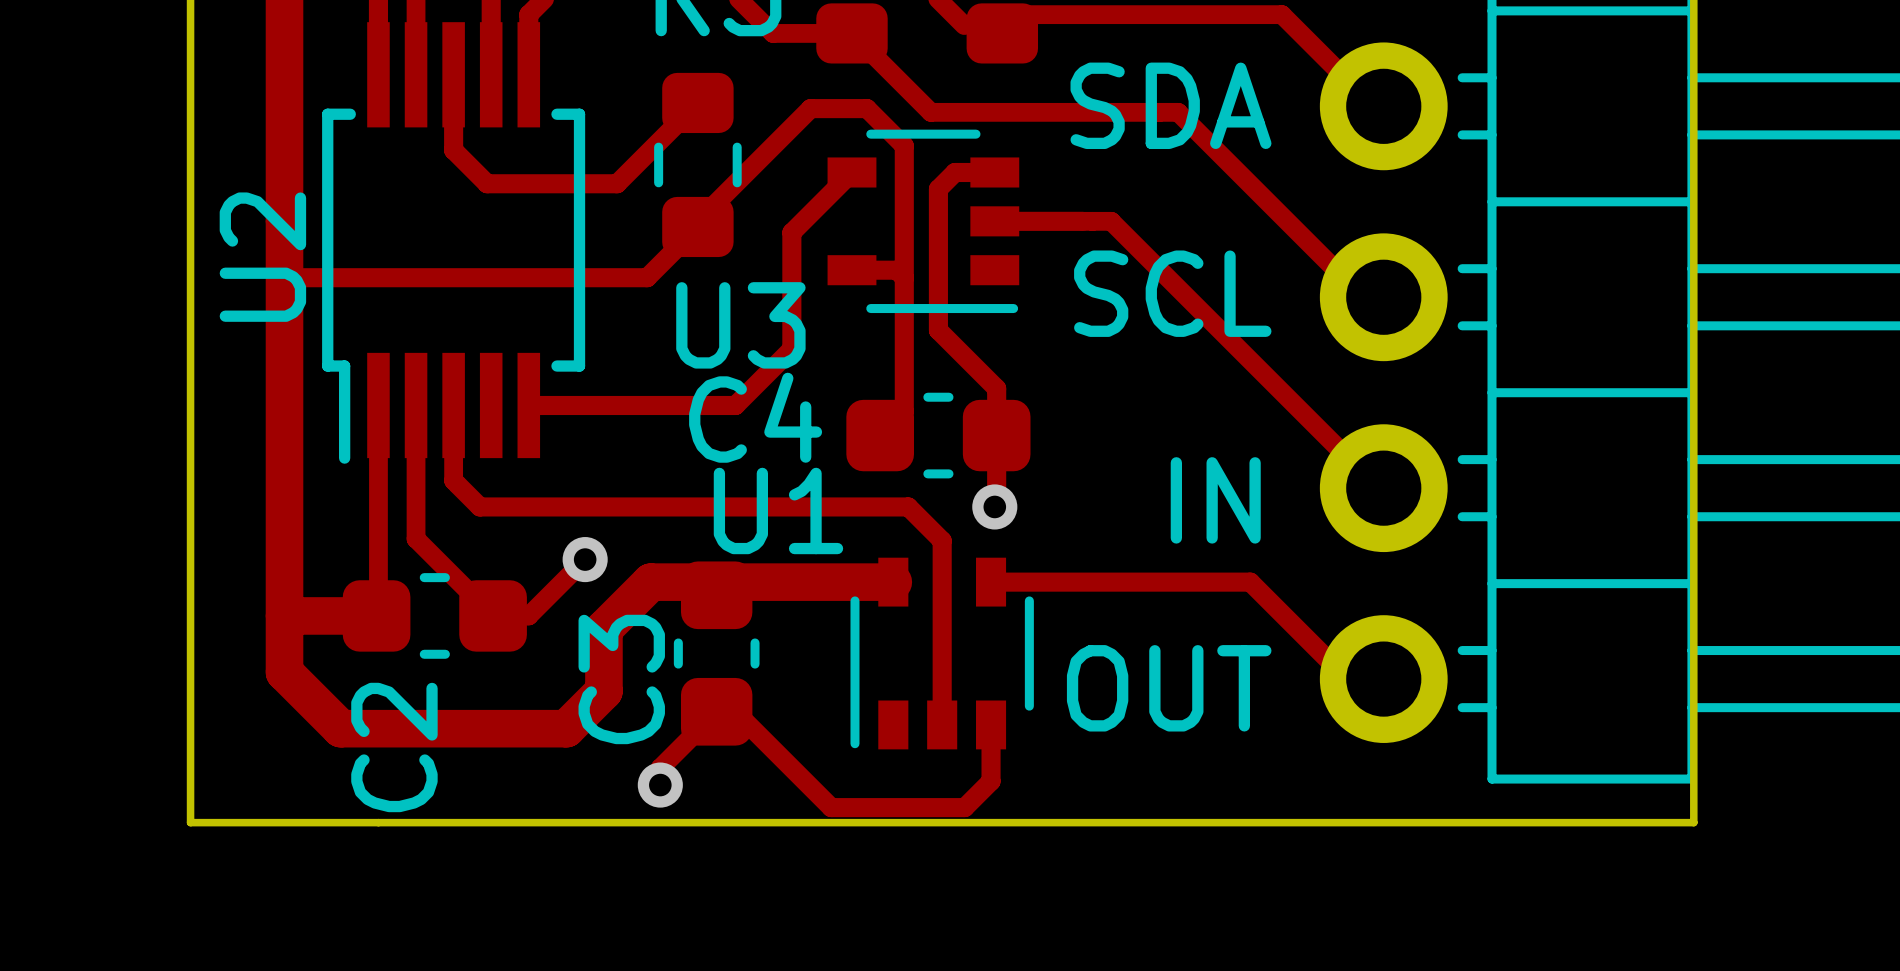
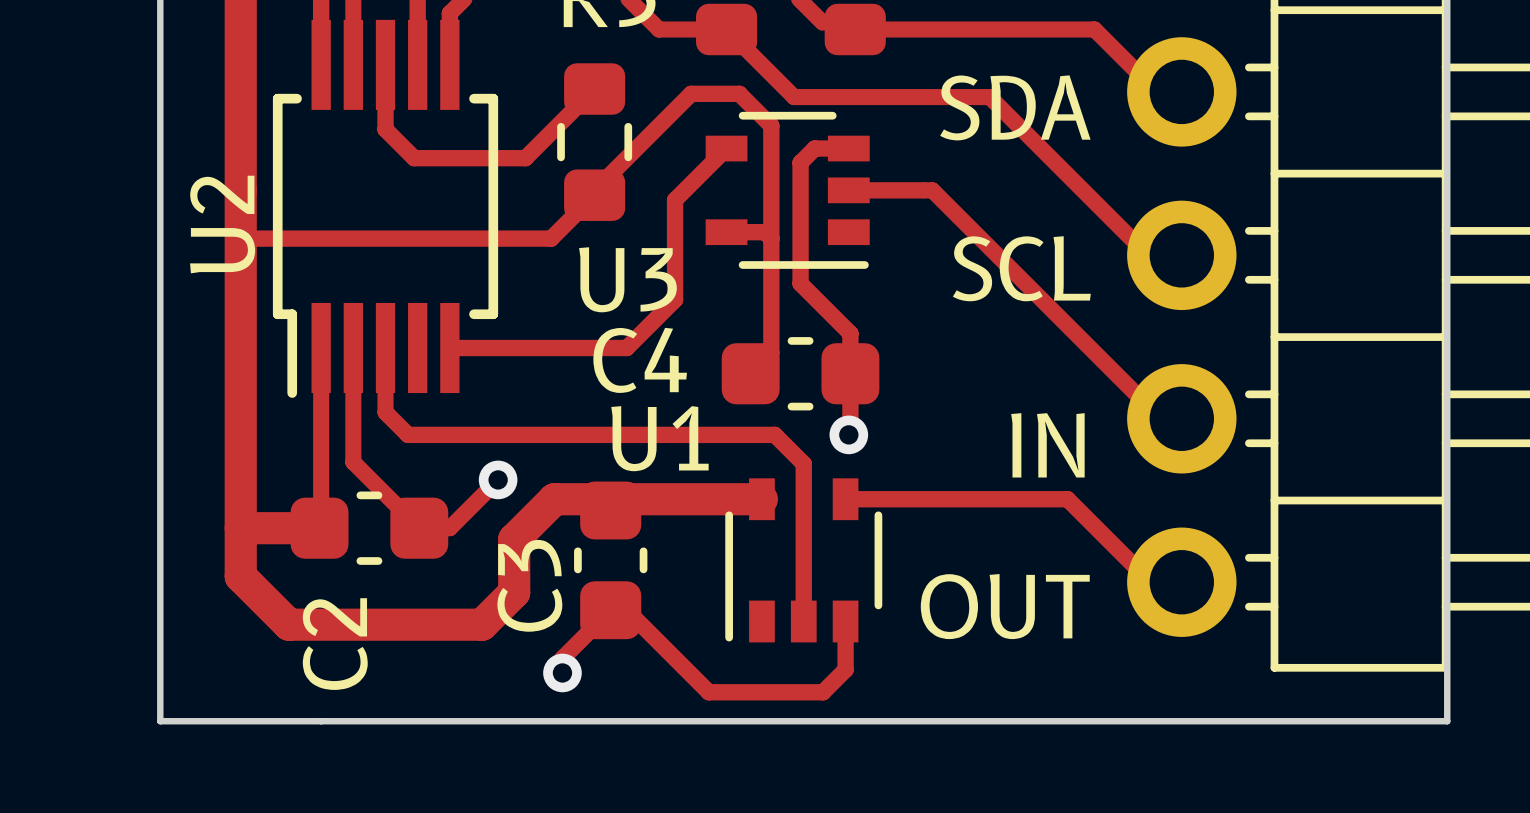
top track: (1002, 14) (1281, 14) (1373, 106) (1383, 106) -> (855, 29) (1094, 29) (1173, 108) (1181, 108)
text position: SDA (1170, 105) -> SDA (1015, 107)
top track: (1159, 112) (1178, 112) (1363, 297) (1383, 297) -> (989, 97) (1164, 271) (1181, 271)
top track: (1092, 221) (1111, 221) (1378, 488) (1383, 488) -> (932, 190) (1176, 434) (1181, 434)
text position: SCL (1172, 293) -> SCL (1021, 268)
text position: IN (1215, 500) -> IN (1047, 445)
text position: OUT (1169, 688) -> OUT (1005, 606)
board edge: (190, 822) (1693, 822) -> (160, 705) (160, 721) (1447, 721) (1447, 705)

